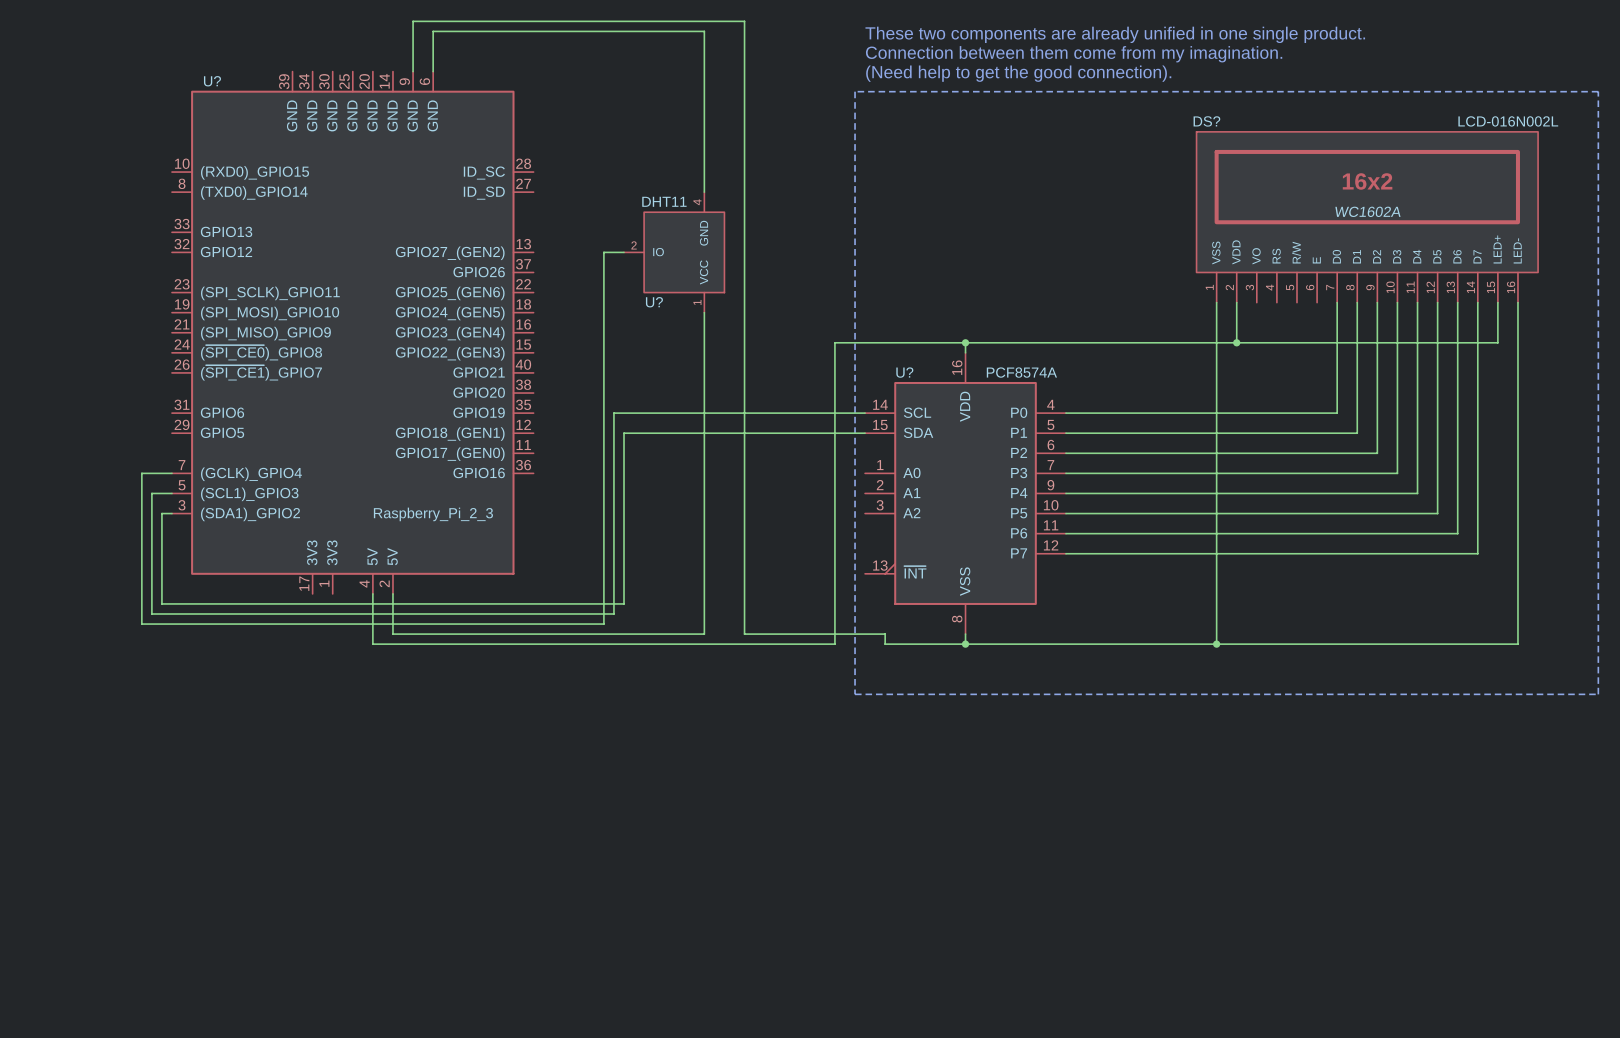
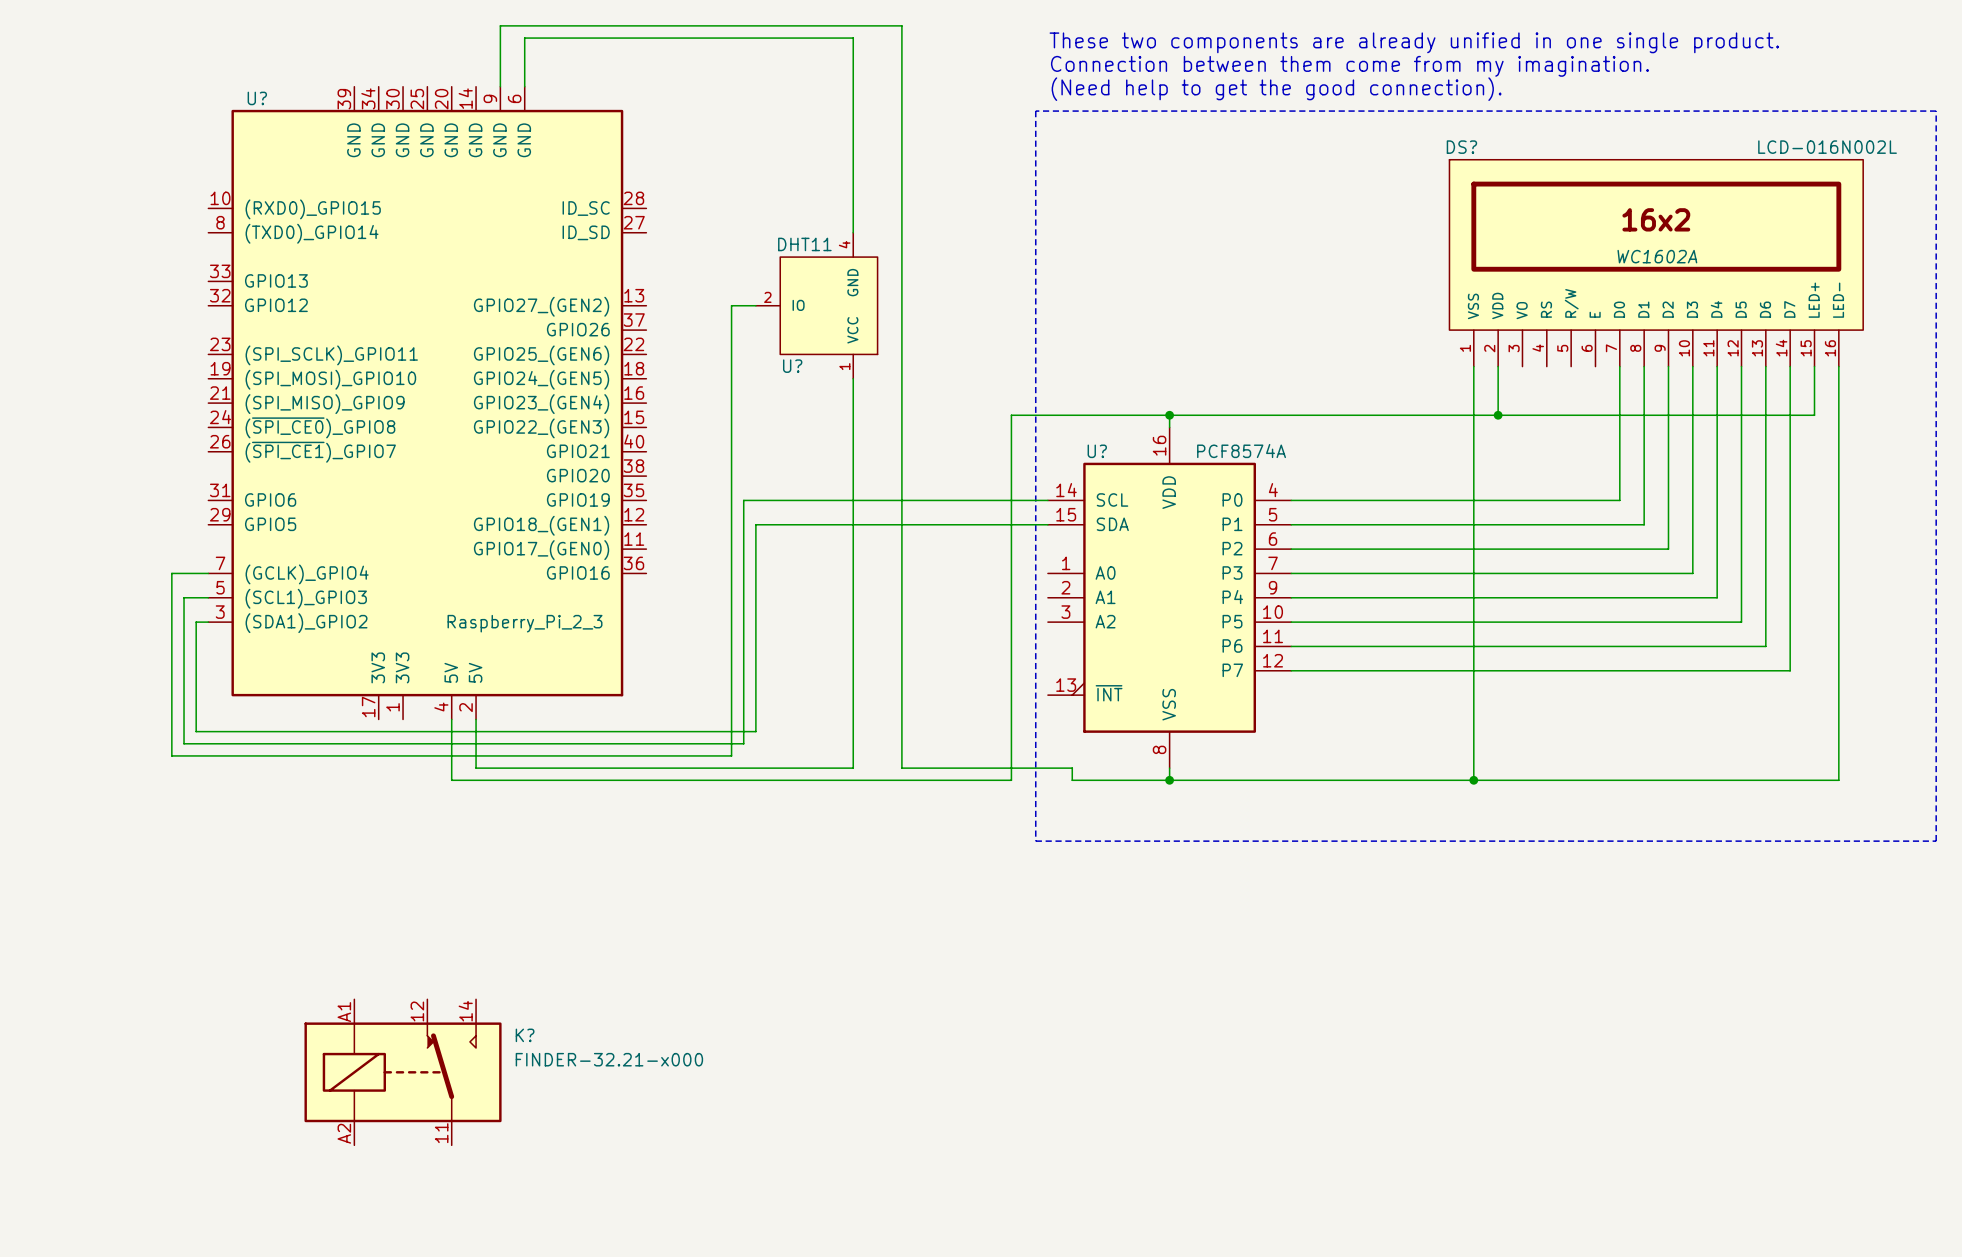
K?: none -> FINDER-32.21-x000 (403, 1072)

